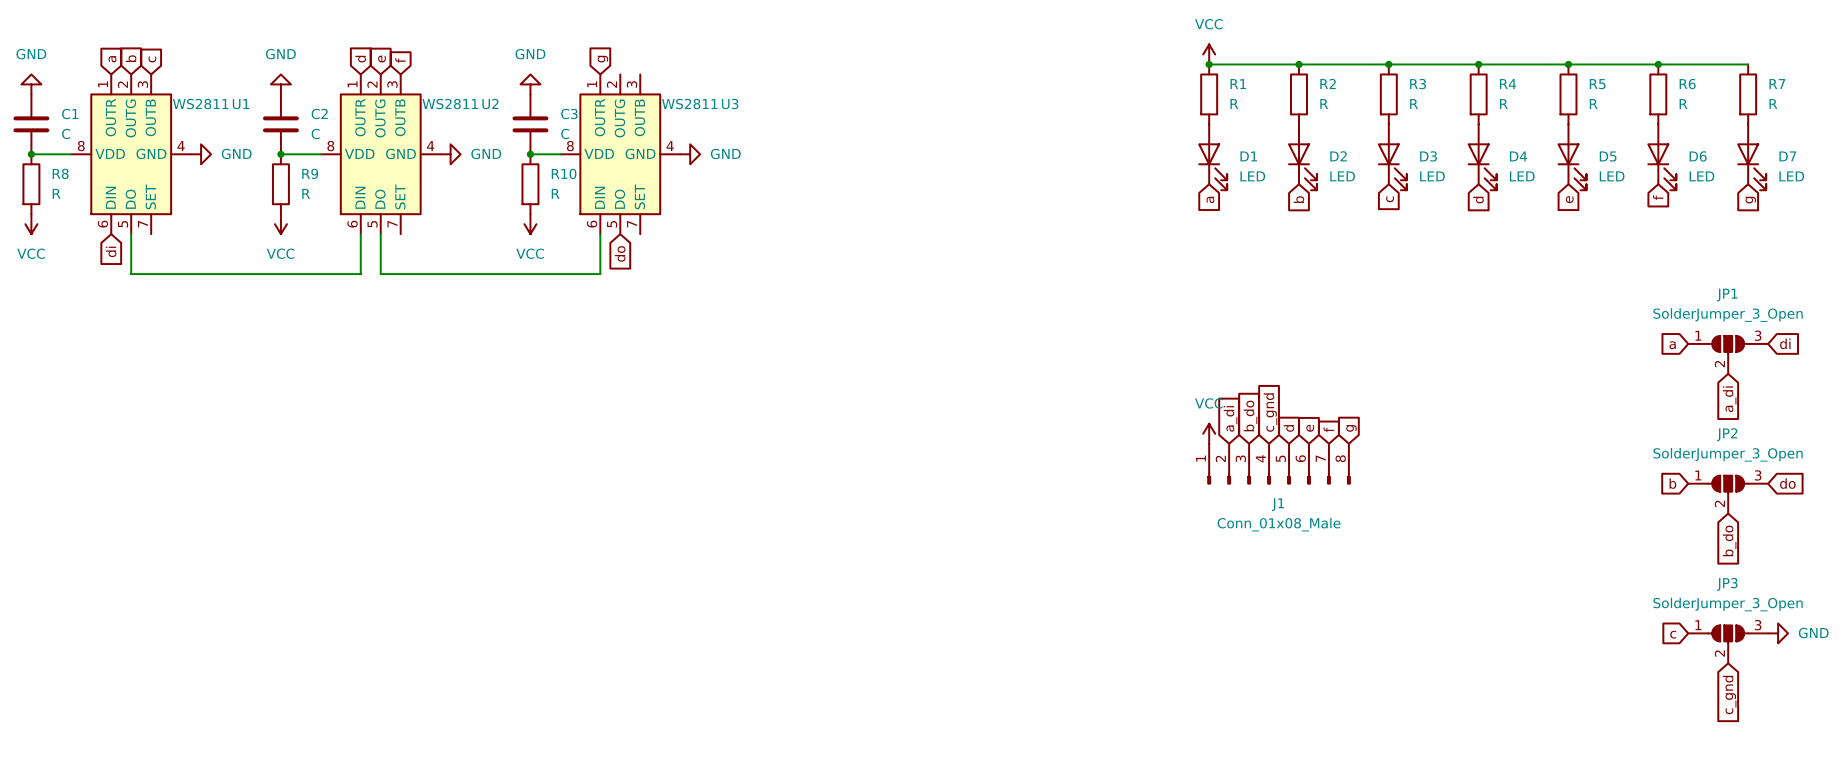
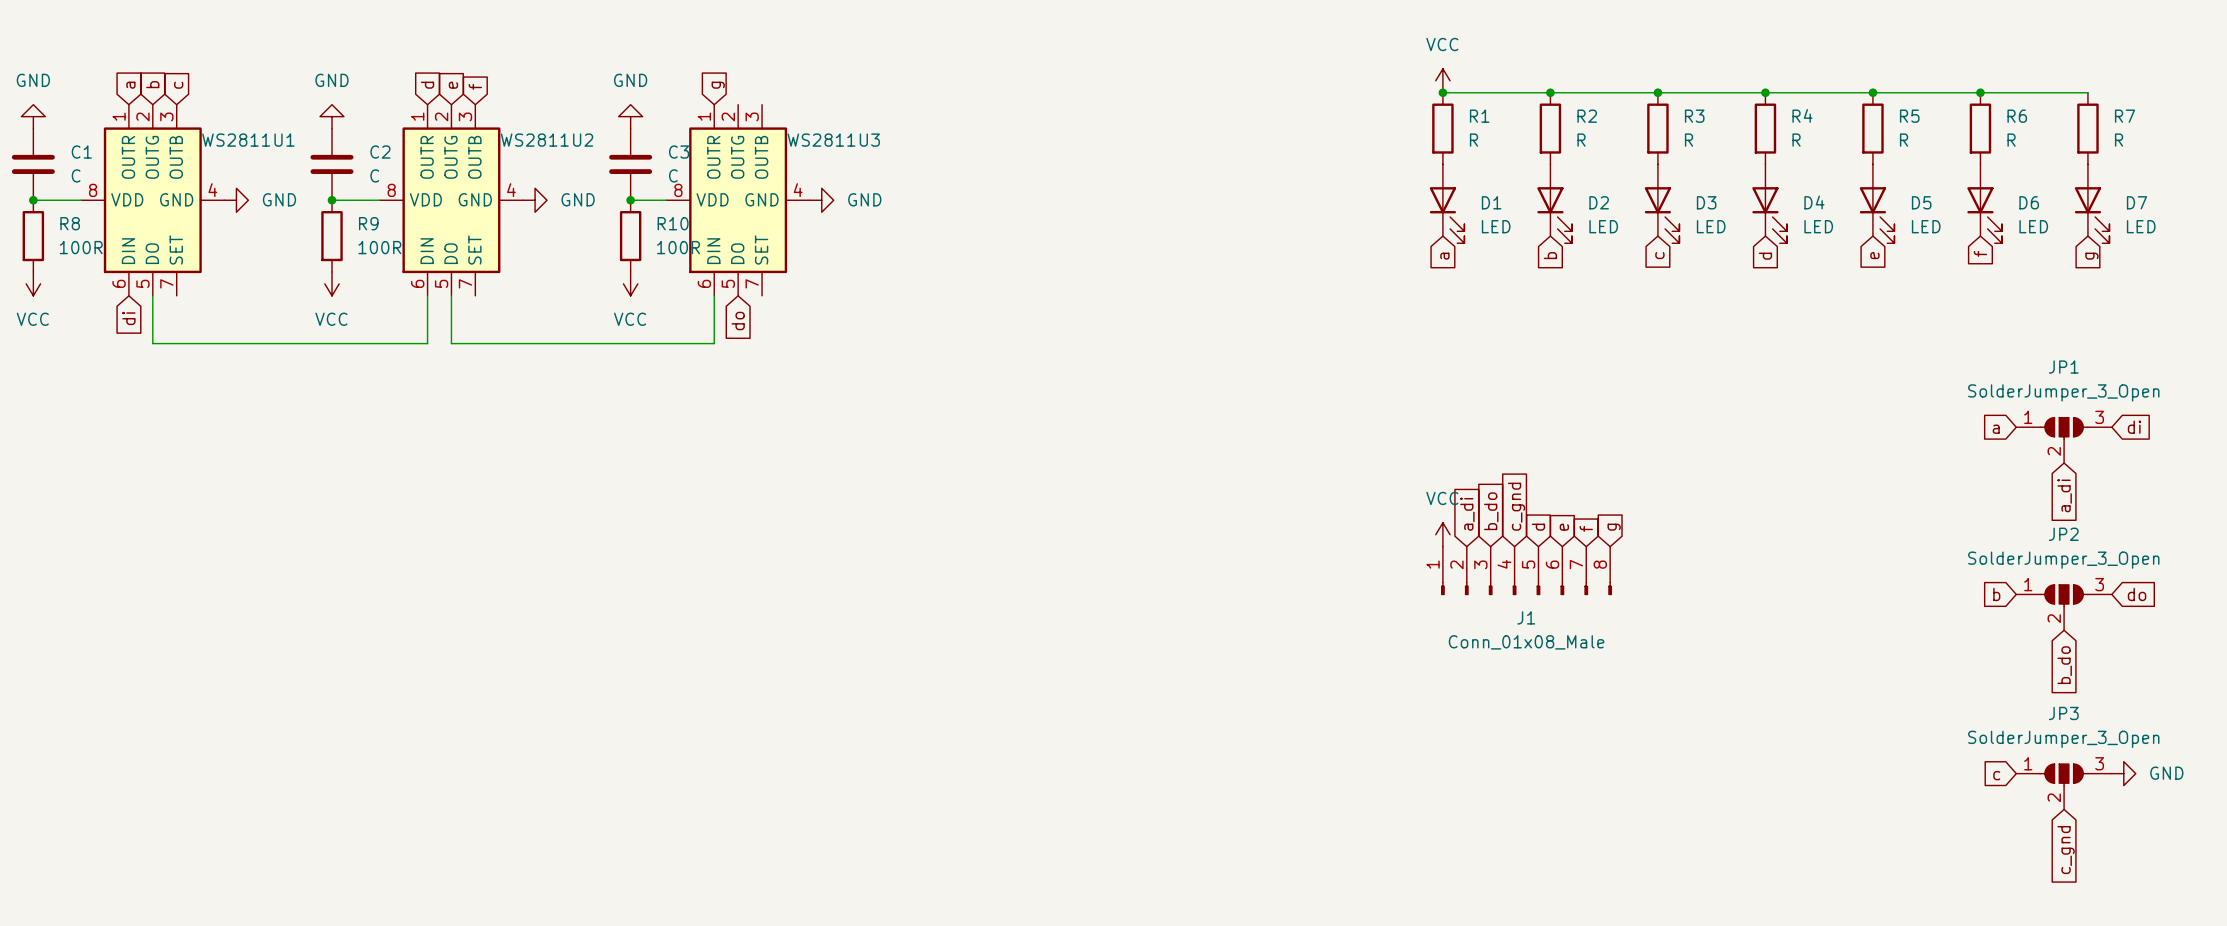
R8 value: R (56, 193) -> 100R (81, 247)
R9 value: R (306, 193) -> 100R (379, 247)
R10 value: R (555, 193) -> 100R (678, 247)

